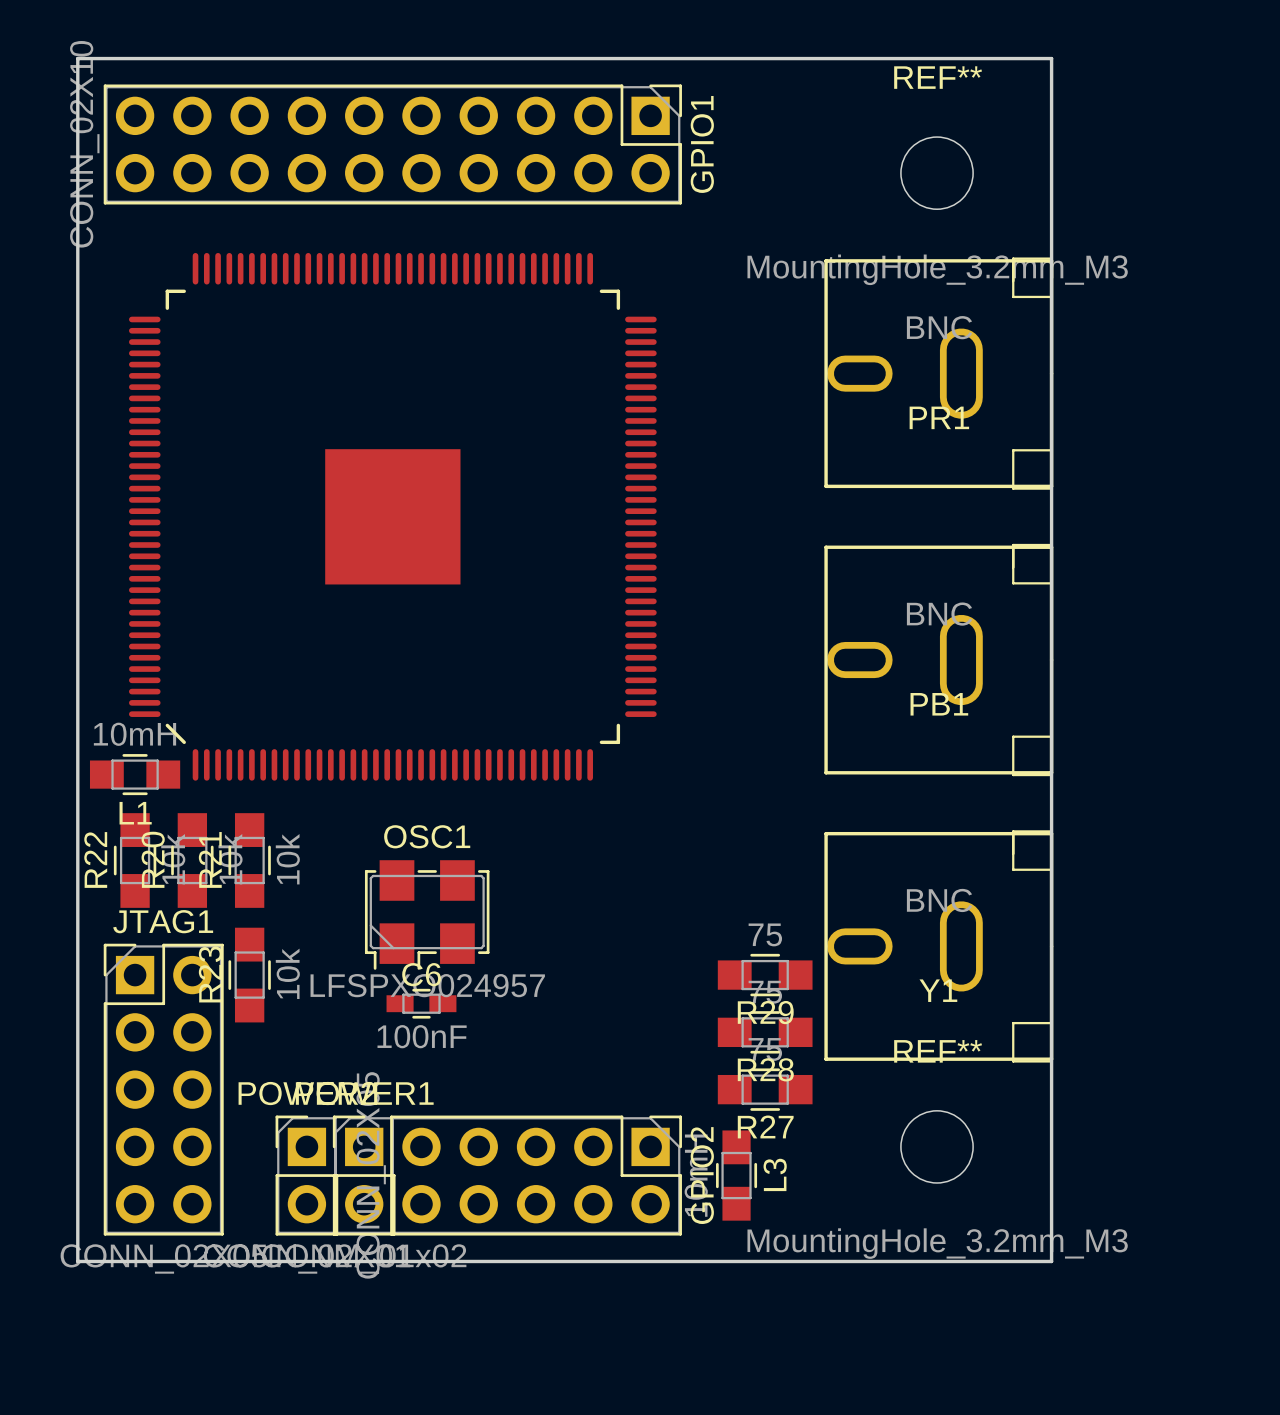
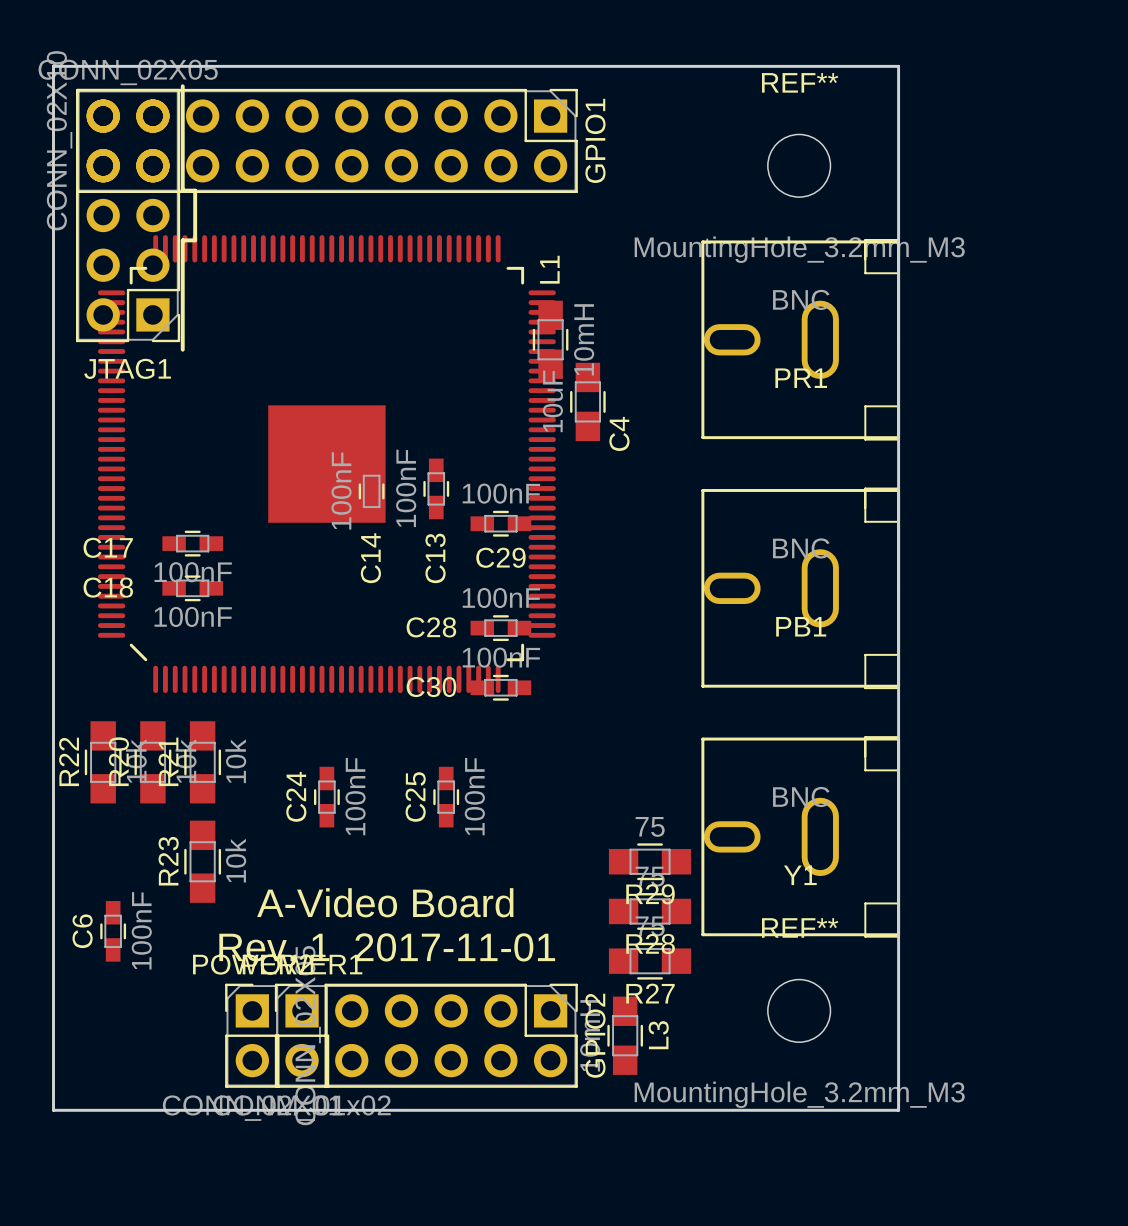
line: none -> (182, 86) (182, 190) (195, 190) (195, 240) (182, 240) (182, 349)
C4: none -> 10uF (587, 401)
C13: none -> 100nF (436, 488)
C14: none -> 100nF (371, 491)
C29: none -> 100nF (500, 523)
C17: none -> 100nF (192, 543)
C18: none -> 100nF (192, 588)
C28: none -> 100nF (500, 628)
L1 rotation: 0° (135, 774) -> 90° clockwise (550, 339)
L1 position: (135, 774) -> (550, 339)
C30: none -> 100nF (500, 687)
L1 name position: L1 (135, 813) -> L1 (549, 269)
C24: none -> 100nF (326, 797)
C25: none -> 100nF (446, 797)
OSC1: LFSPXO024957 (427, 914) -> none
C6 rotation: 0° (421, 1003) -> 90° clockwise (113, 931)
C6 position: (421, 1003) -> (113, 931)
text: none -> A-Video Board (385, 902)
C6 value position: 100nF (422, 1036) -> 100nF (141, 930)
text: none -> Rev. 1 2017-11-01 (387, 947)
JTAG1 rotation: 0° (163, 1089) -> 180° (128, 215)
JTAG1 position: (163, 1089) -> (128, 215)

